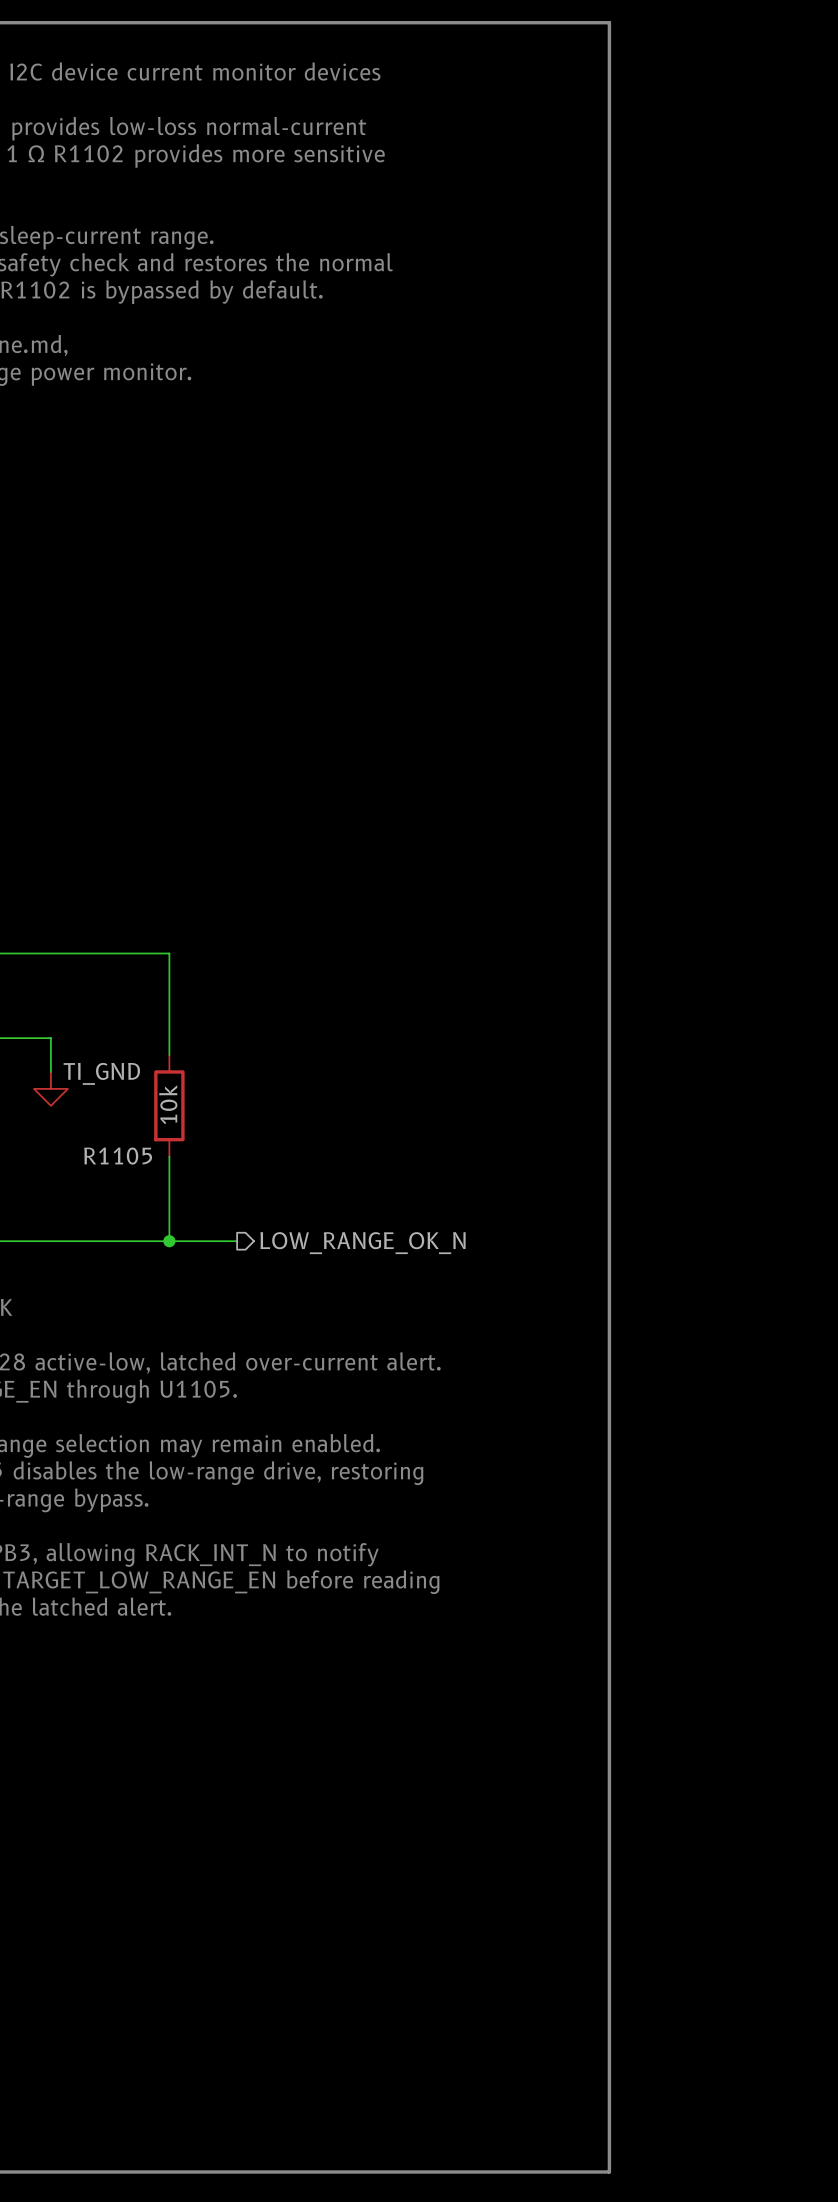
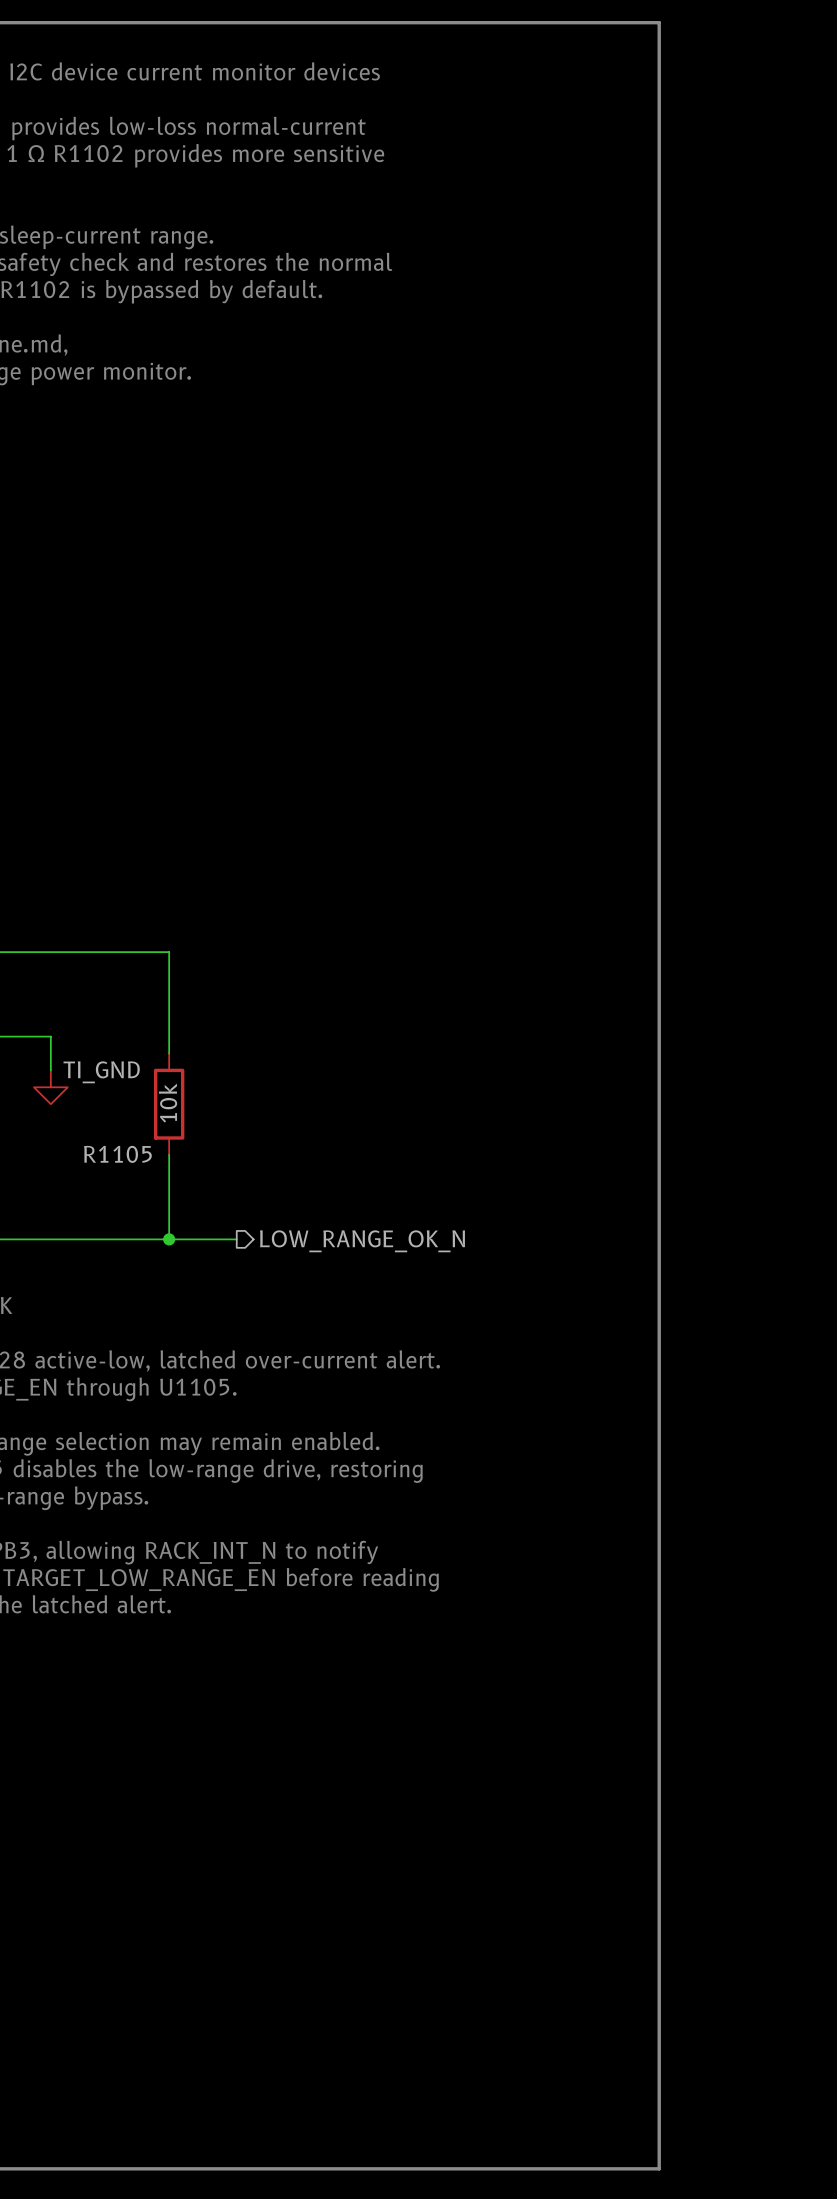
line: (609, 22) (609, 2172) -> (608, 22) (659, 22) (659, 2168) (608, 2168)

